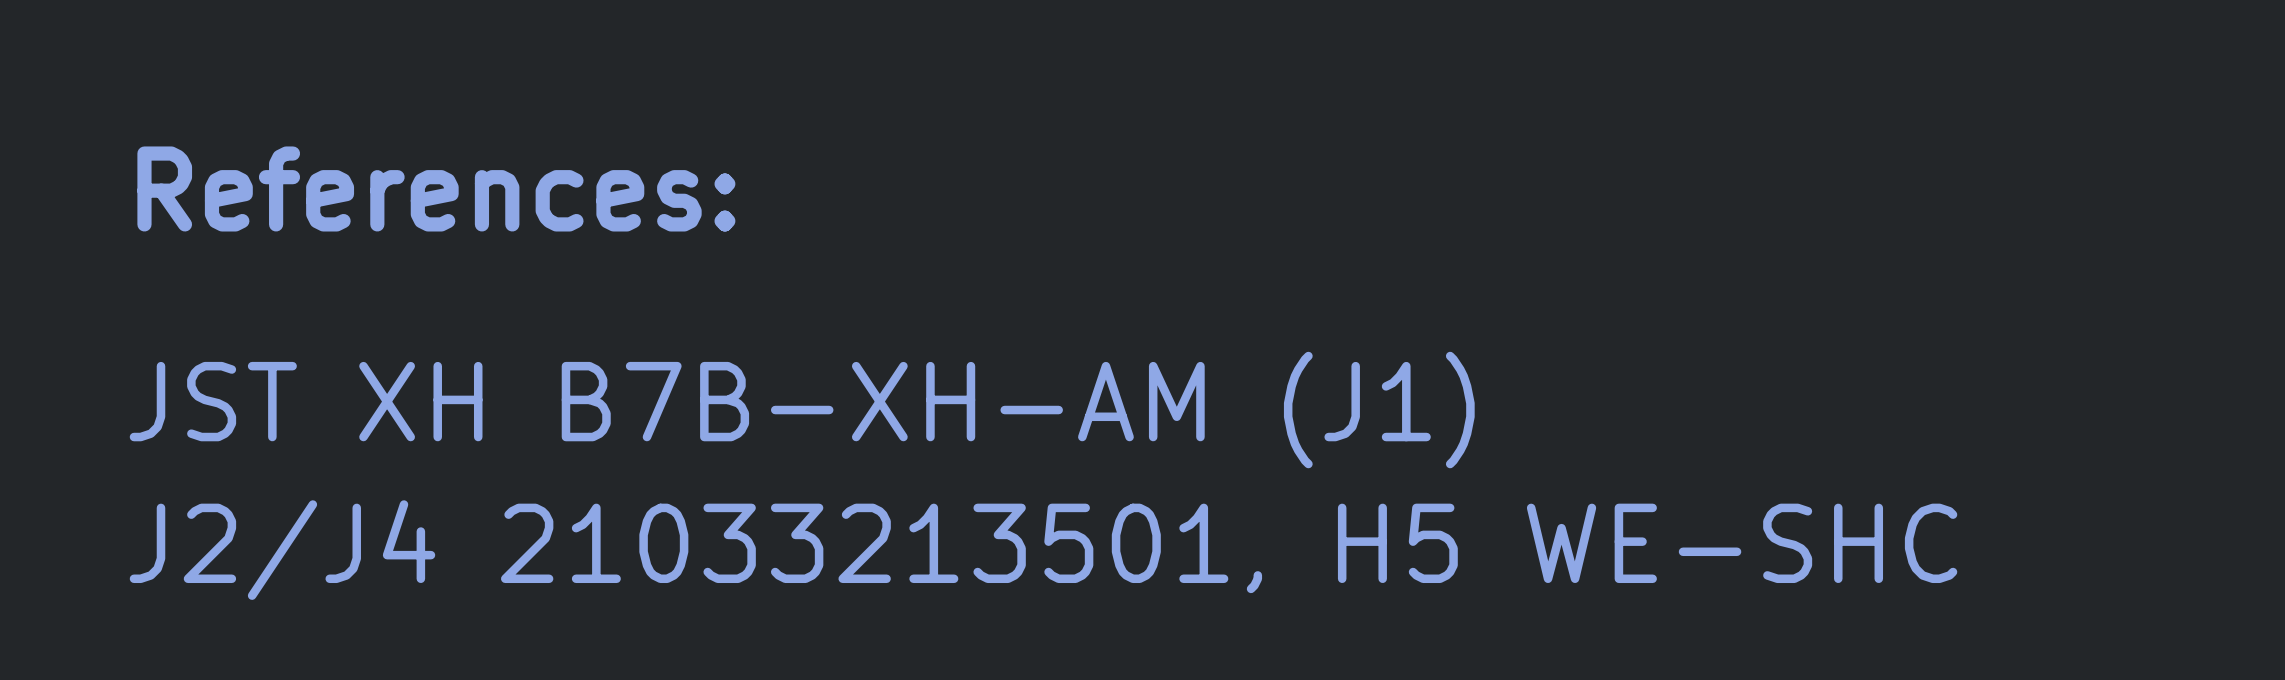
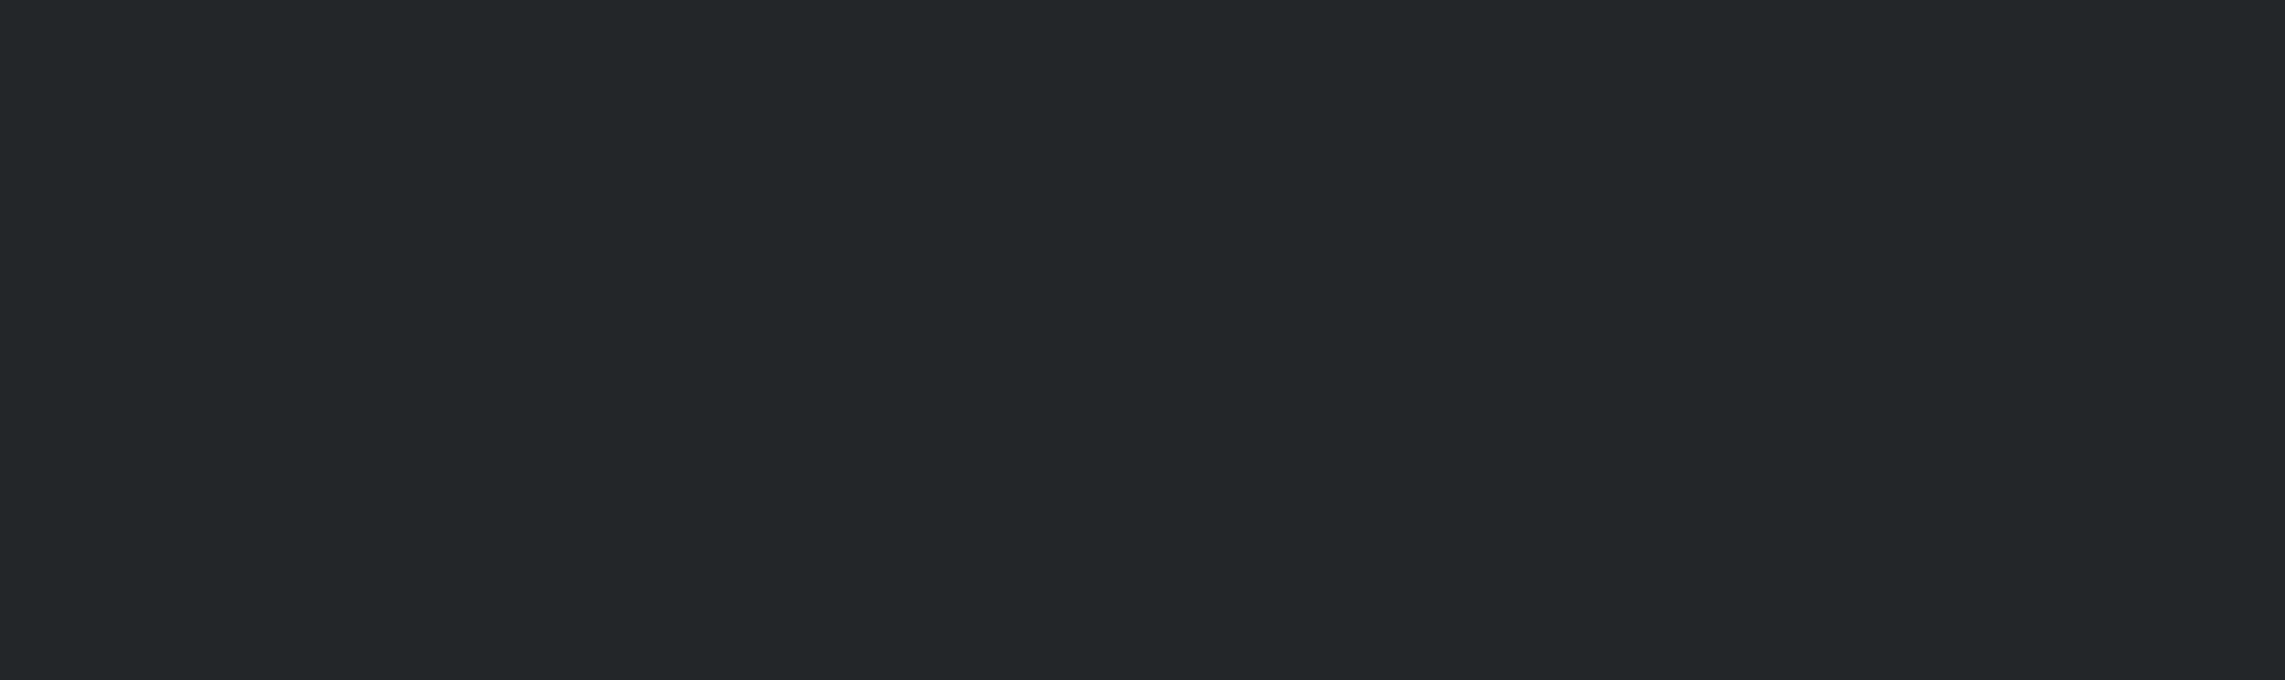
text: References: (436, 188) -> none
text: JST XH B7B-XH-AM (J1) (802, 410) -> none
text: J2/J4 21033213501, H5 WE-SHC (1043, 550) -> none

